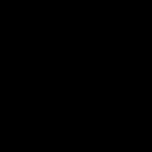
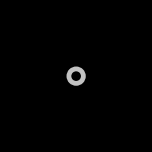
via: none -> (76, 76)

